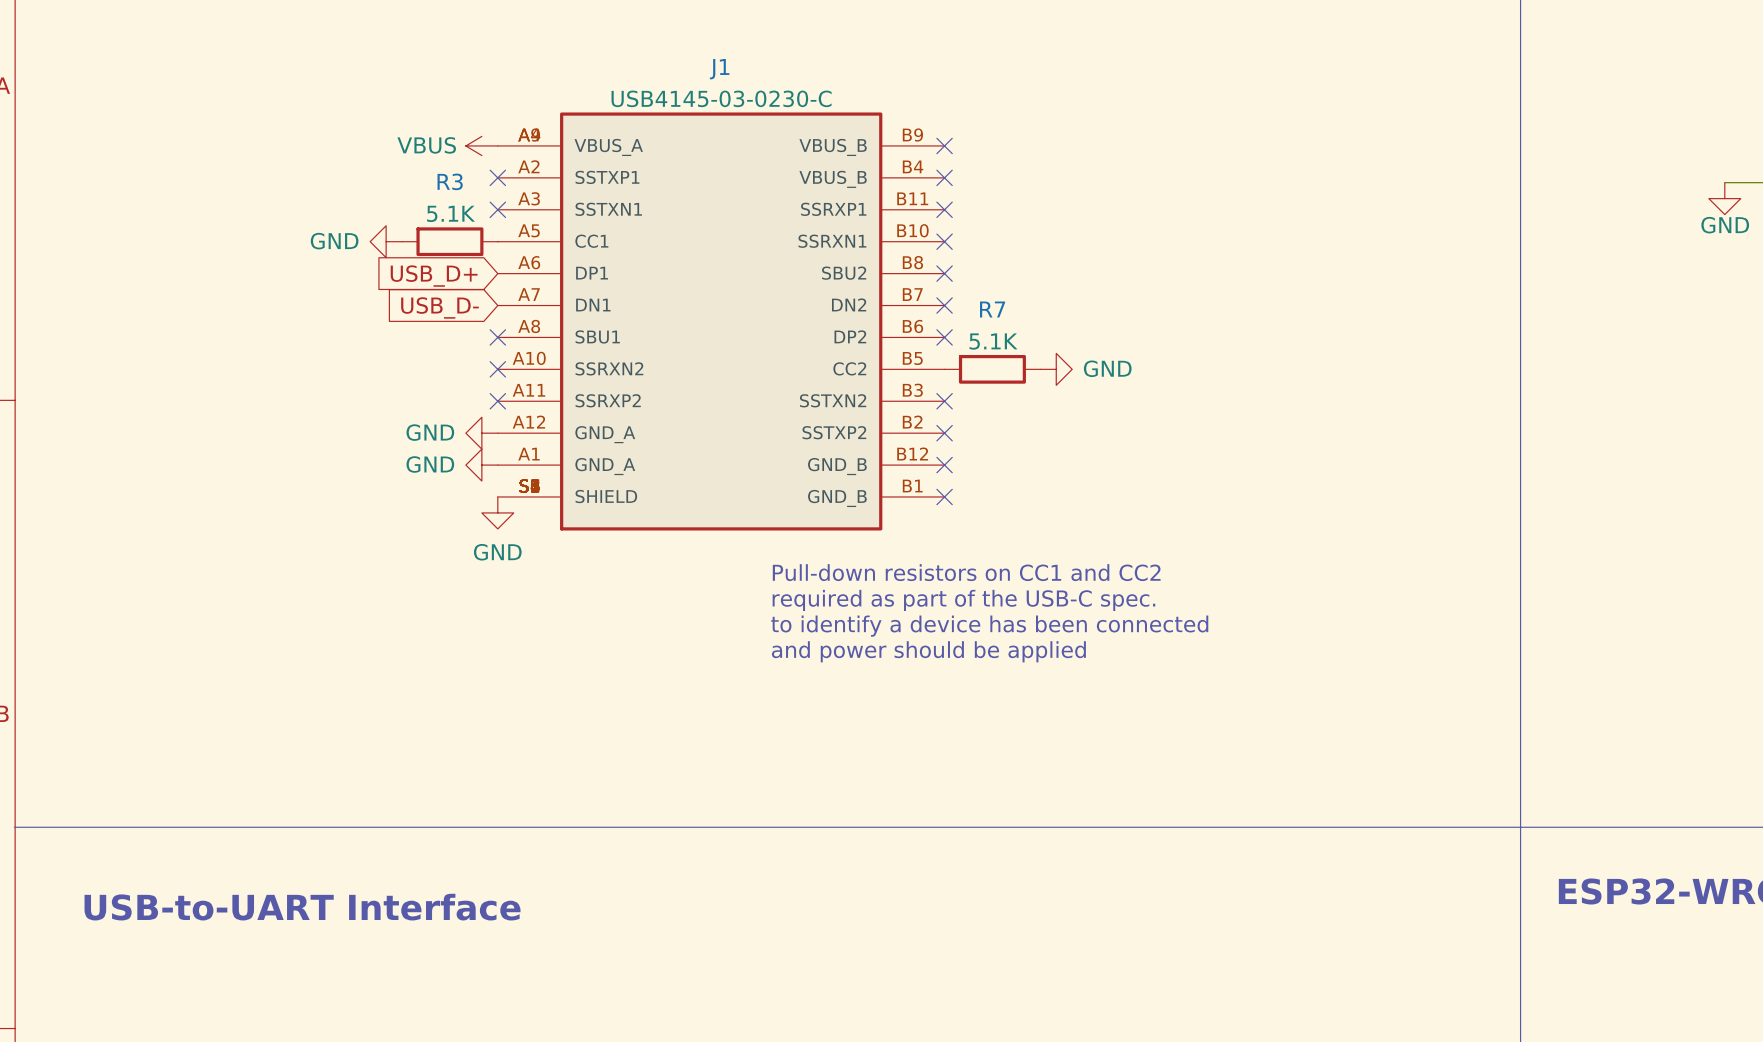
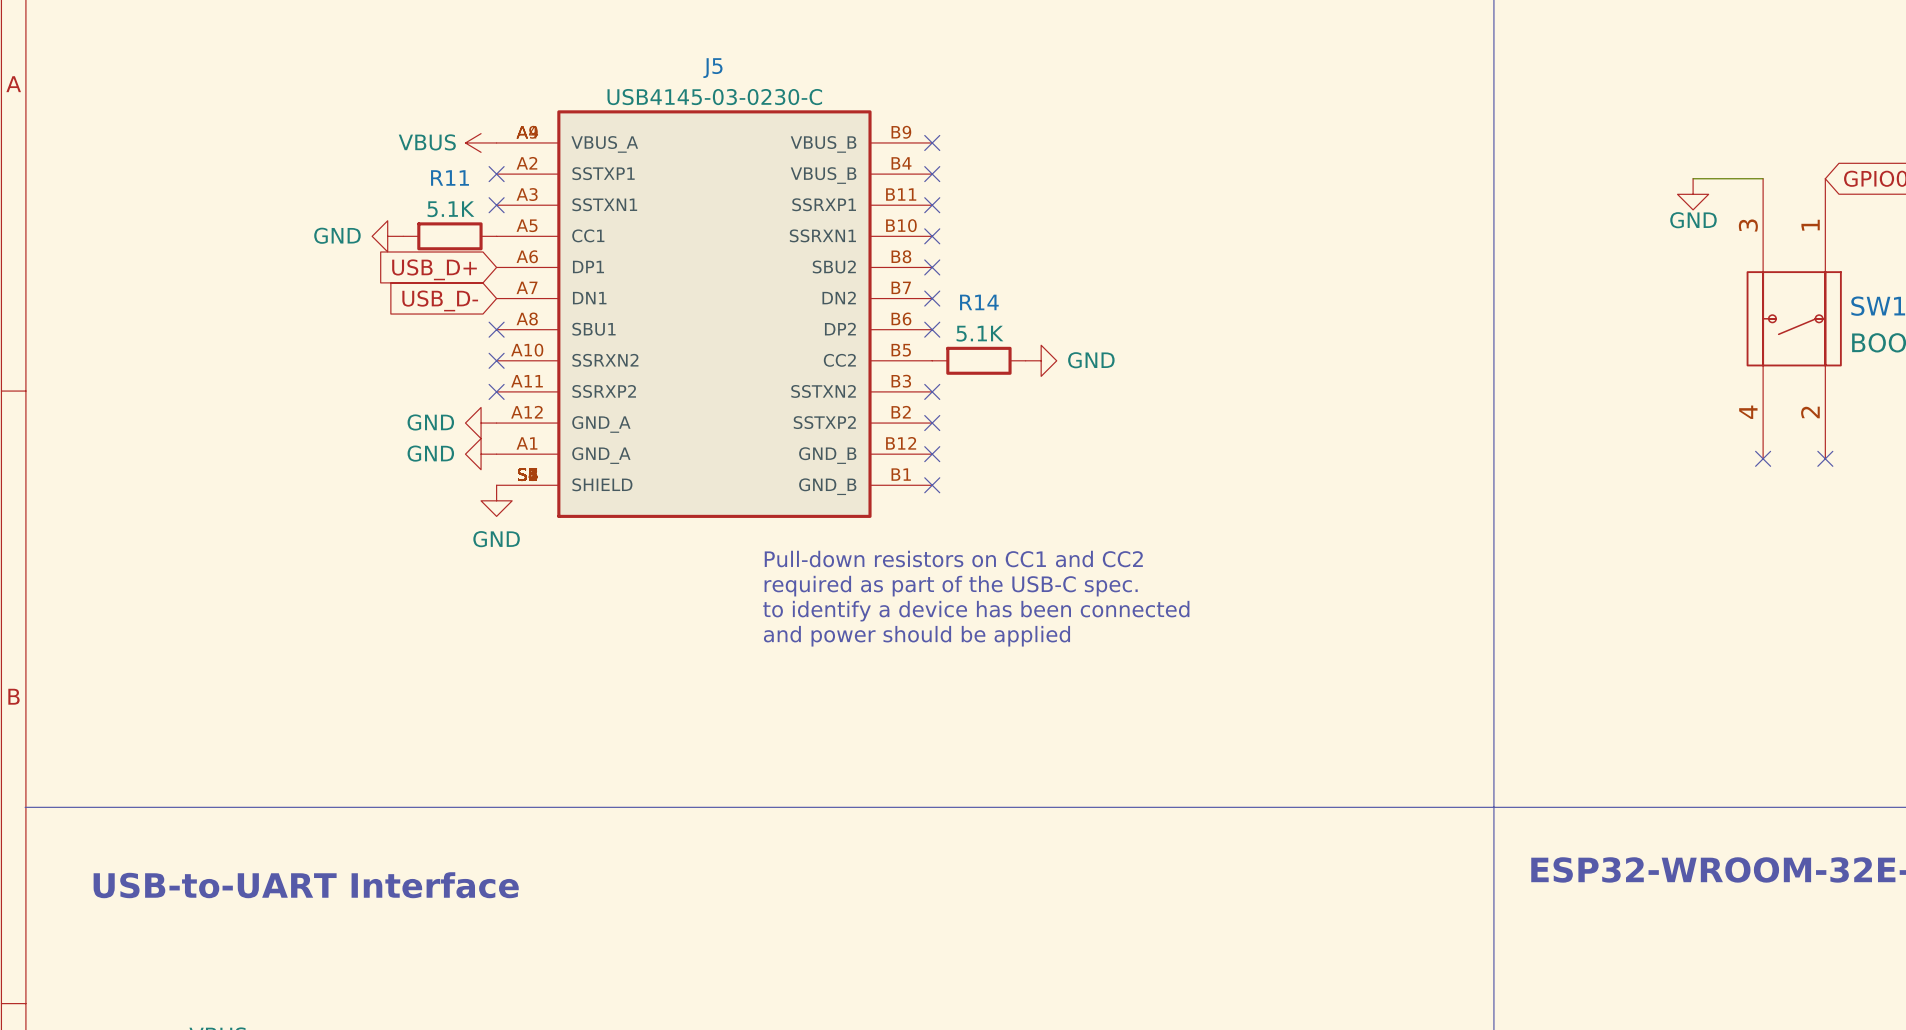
J1 name: J1 (719, 69) -> J5 (712, 68)
R3 name: R3 (450, 181) -> R11 (449, 177)
R7 name: R7 (992, 309) -> R14 (979, 302)

